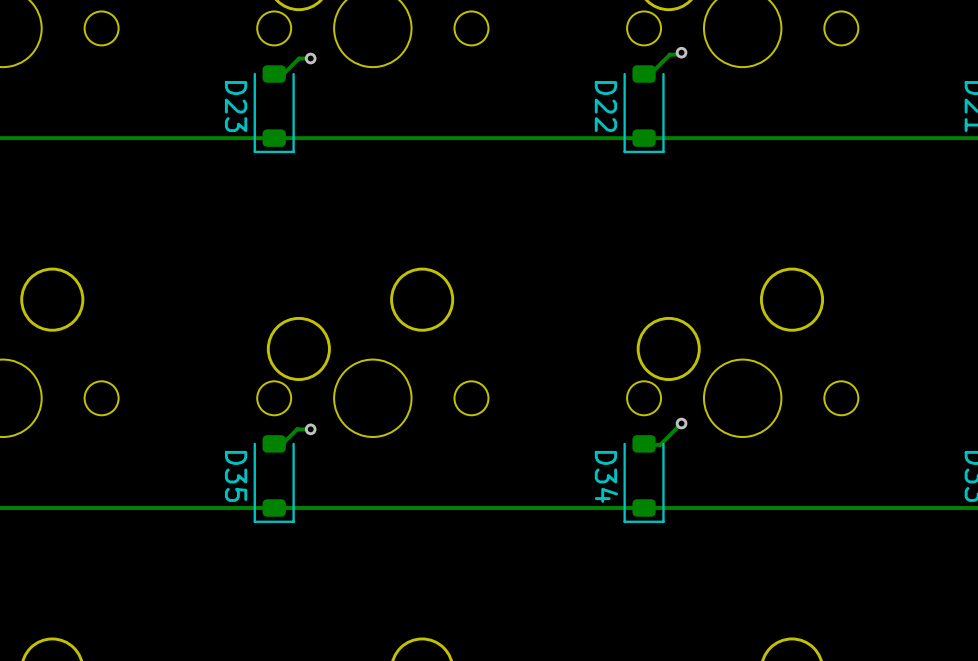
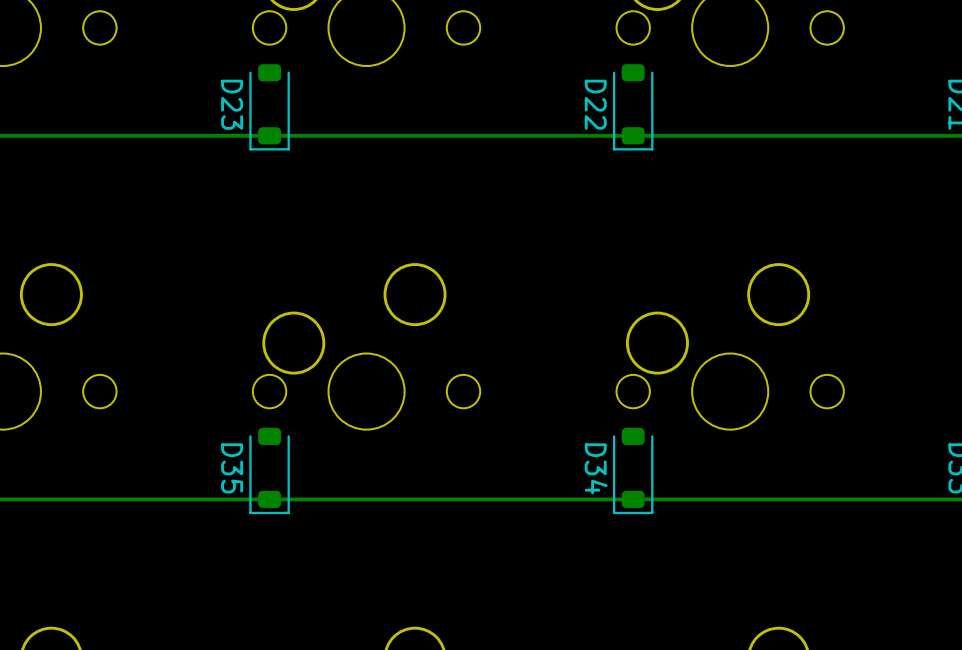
via: (681, 52) -> none
track: (679, 54) (669, 54) (650, 74) (644, 74) -> none
track: (310, 58) (299, 58) (283, 74) (273, 74) -> none
via: (310, 58) -> none
via: (681, 423) -> none
track: (679, 425) (660, 444) (644, 443) -> none
track: (310, 429) (297, 429) (281, 444) (274, 443) -> none
via: (310, 429) -> none

